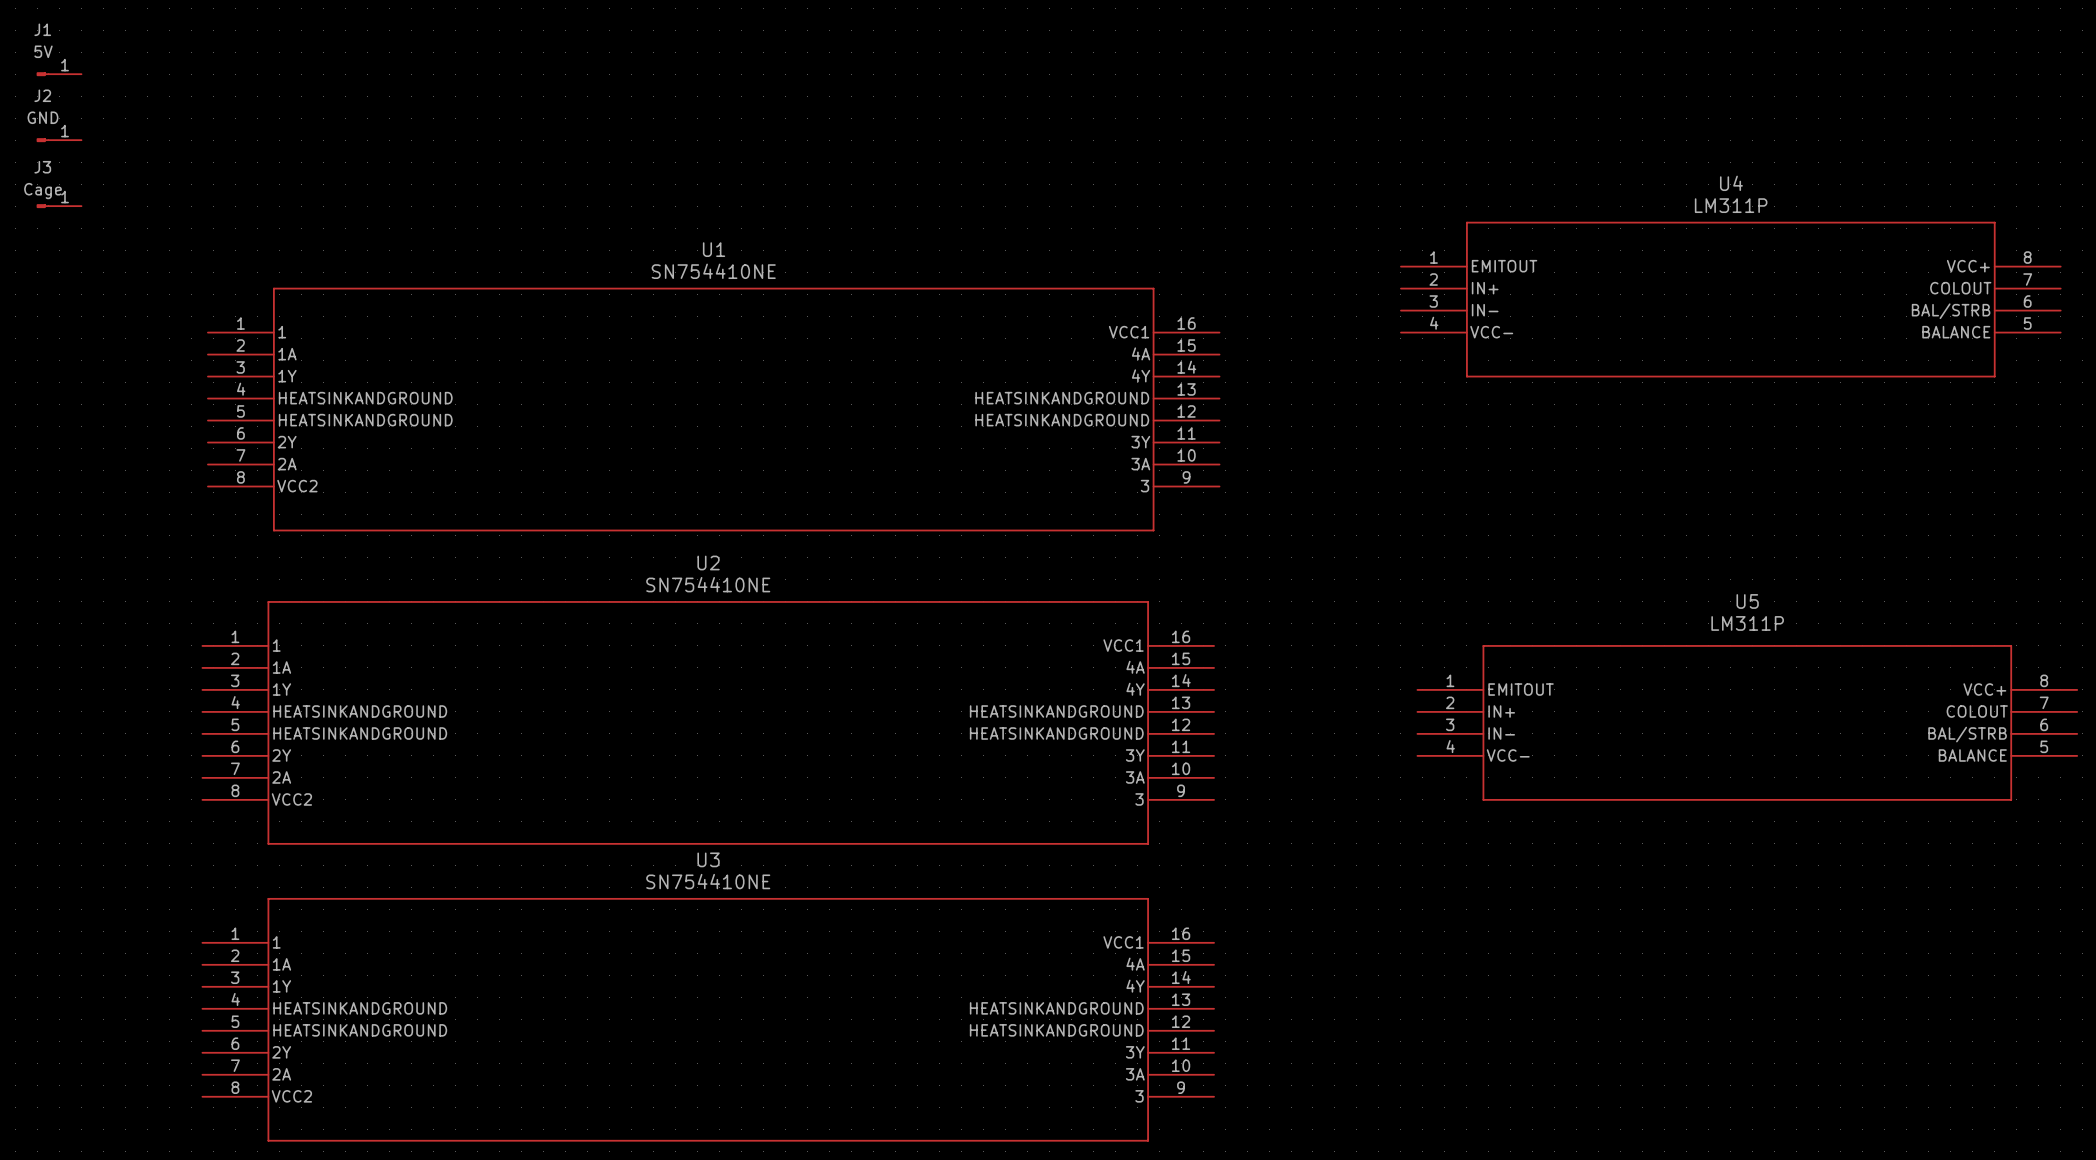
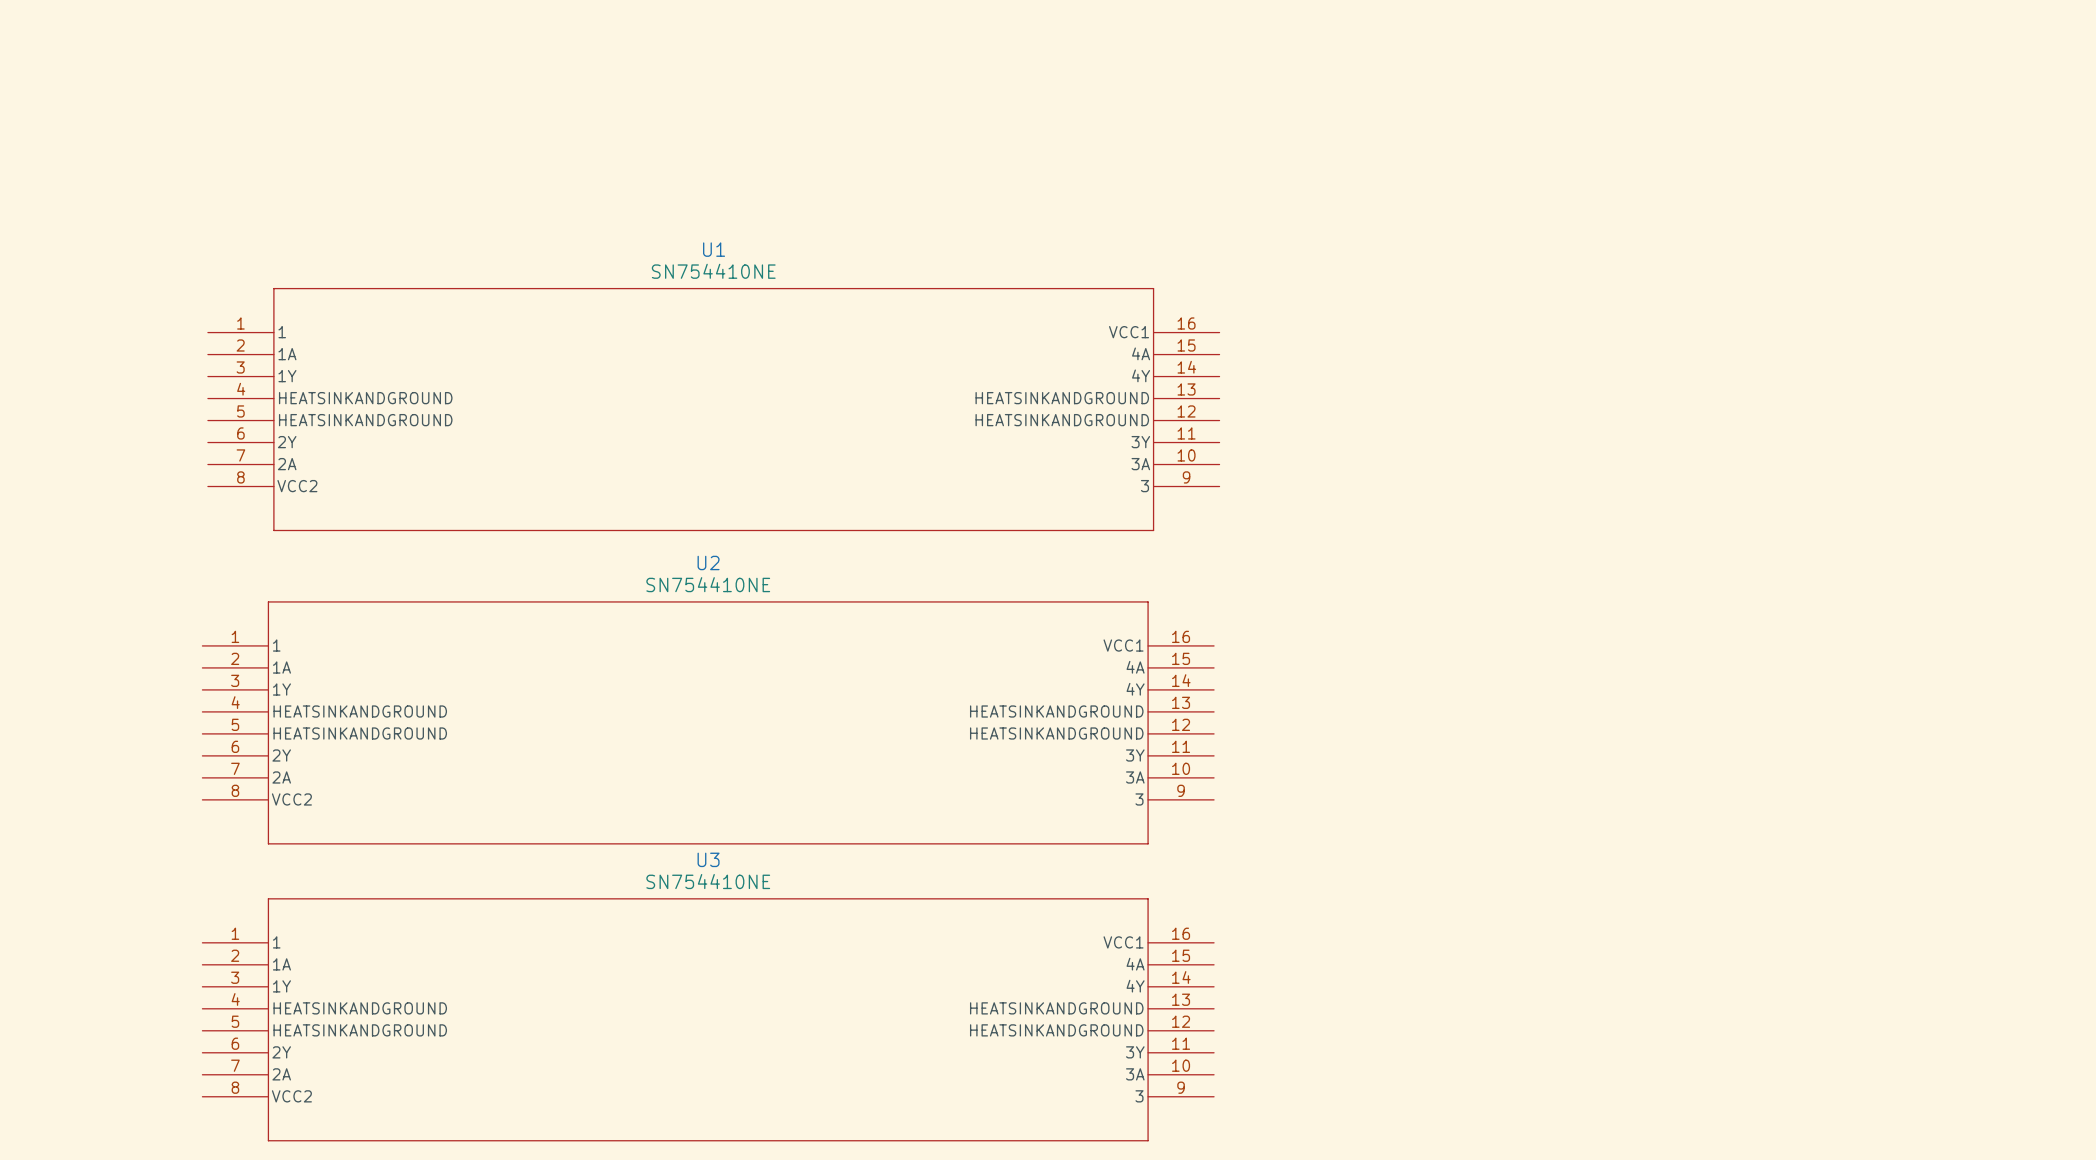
J1: 5V (59, 74) -> none
J2: GND (59, 140) -> none
J3: Cage (59, 206) -> none
U4: LM311P (1730, 299) -> none
U5: LM311P (1747, 722) -> none

